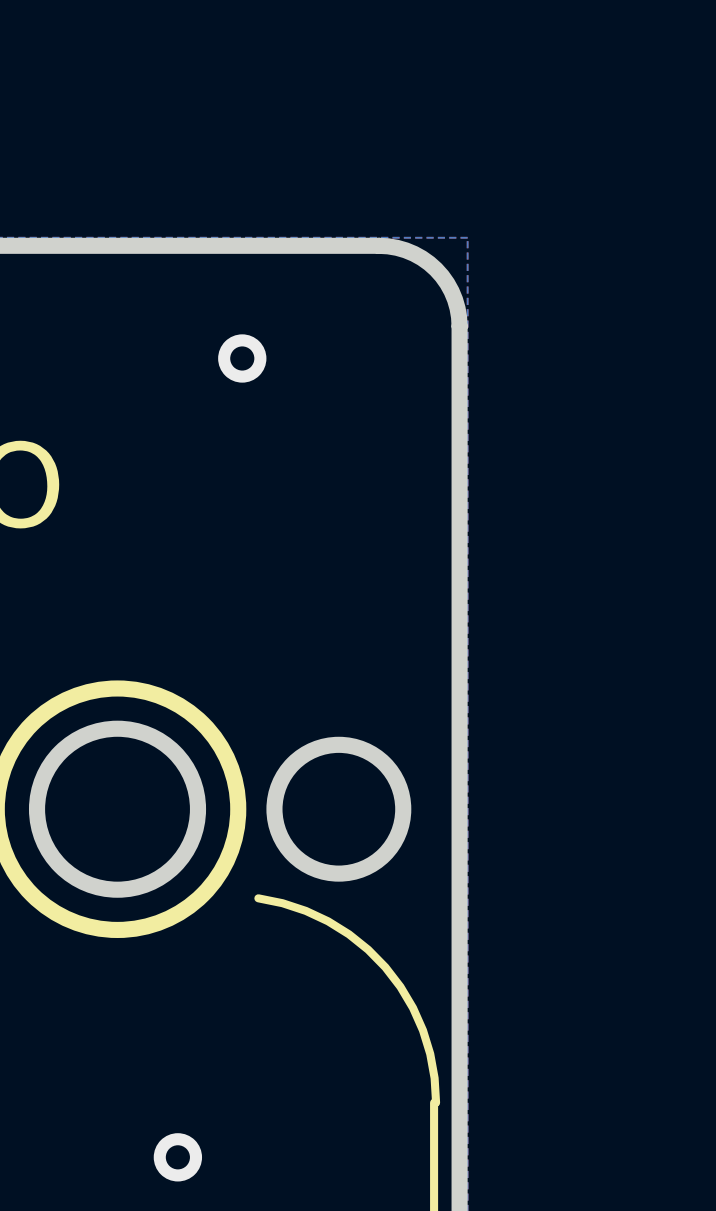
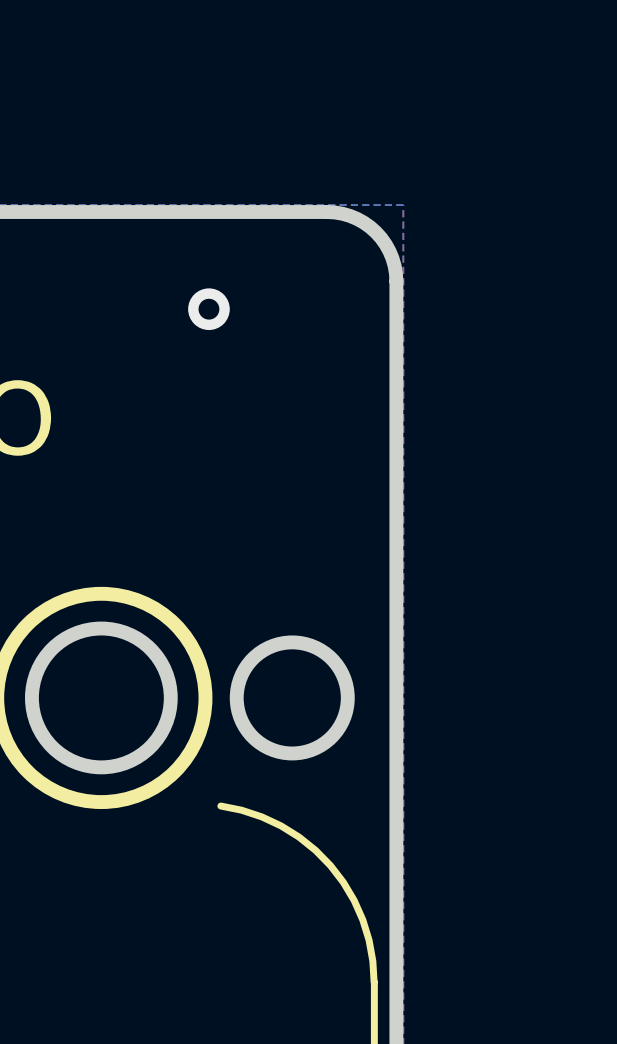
line: (258, 898) (305, 910) (328, 921) (349, 934) (385, 967) (413, 1007) (423, 1030) (430, 1053) (436, 1102) -> none
line: (434, 1102) (434, 1138) -> (220, 806) (261, 816) (281, 825) (315, 850) (330, 865) (343, 882) (362, 919) (372, 961) (374, 982)
via: (177, 1157) -> none

